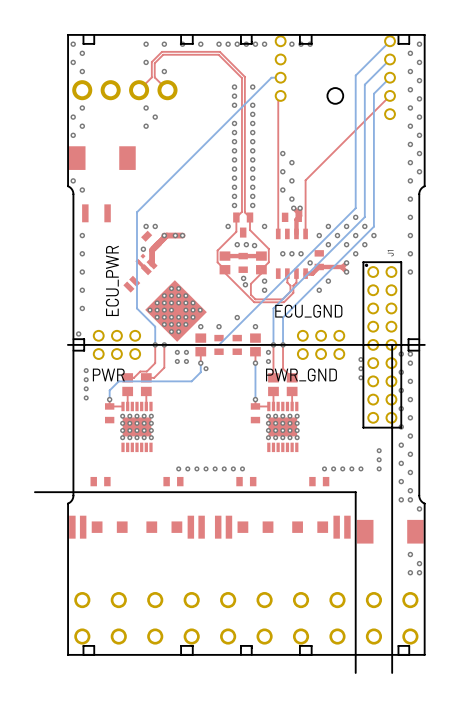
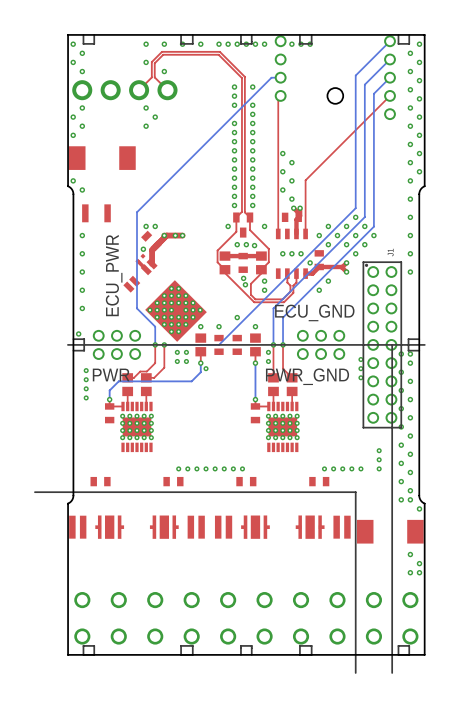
part footprint: [91, 521, 128, 533] -> [95, 515, 125, 539]
part footprint: [146, 521, 183, 533] -> [149, 515, 179, 539]
part footprint: [237, 521, 274, 533] -> [241, 515, 270, 539]
part footprint: [292, 521, 329, 533] -> [295, 515, 325, 539]

